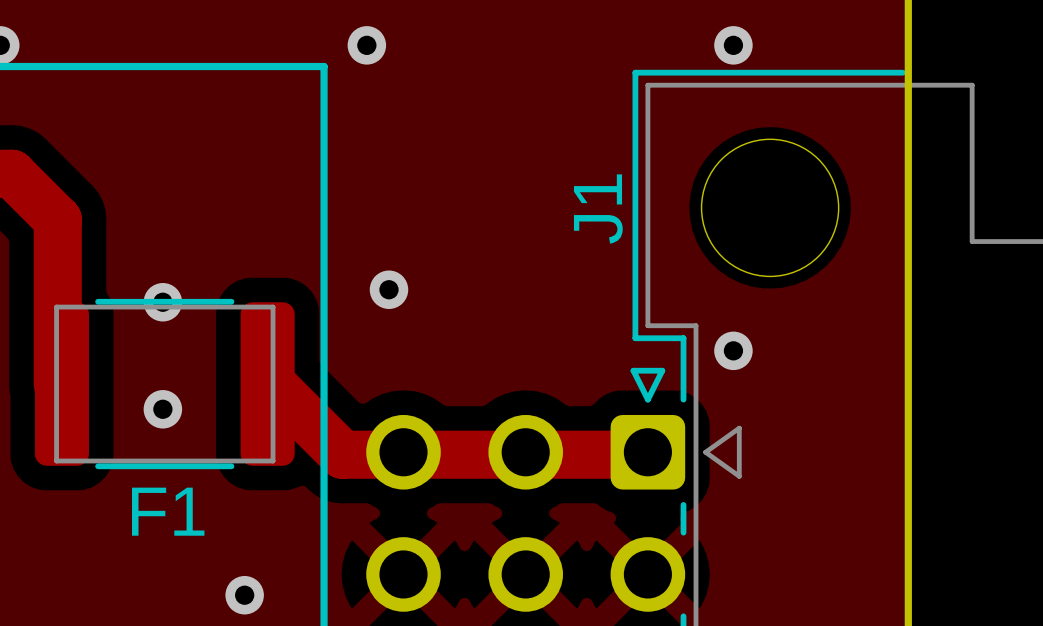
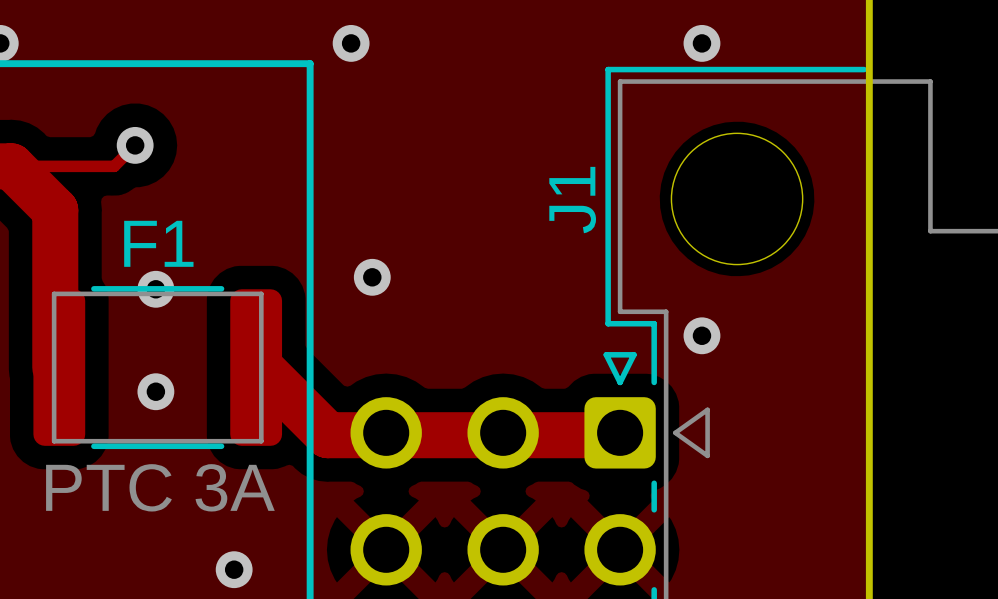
track: none -> (135, 145) (114, 166) (11, 166)
via: none -> (135, 145)
F1 value: none -> PTC 3A (160, 487)
F1 name position: F1 (168, 511) -> F1 (158, 243)

